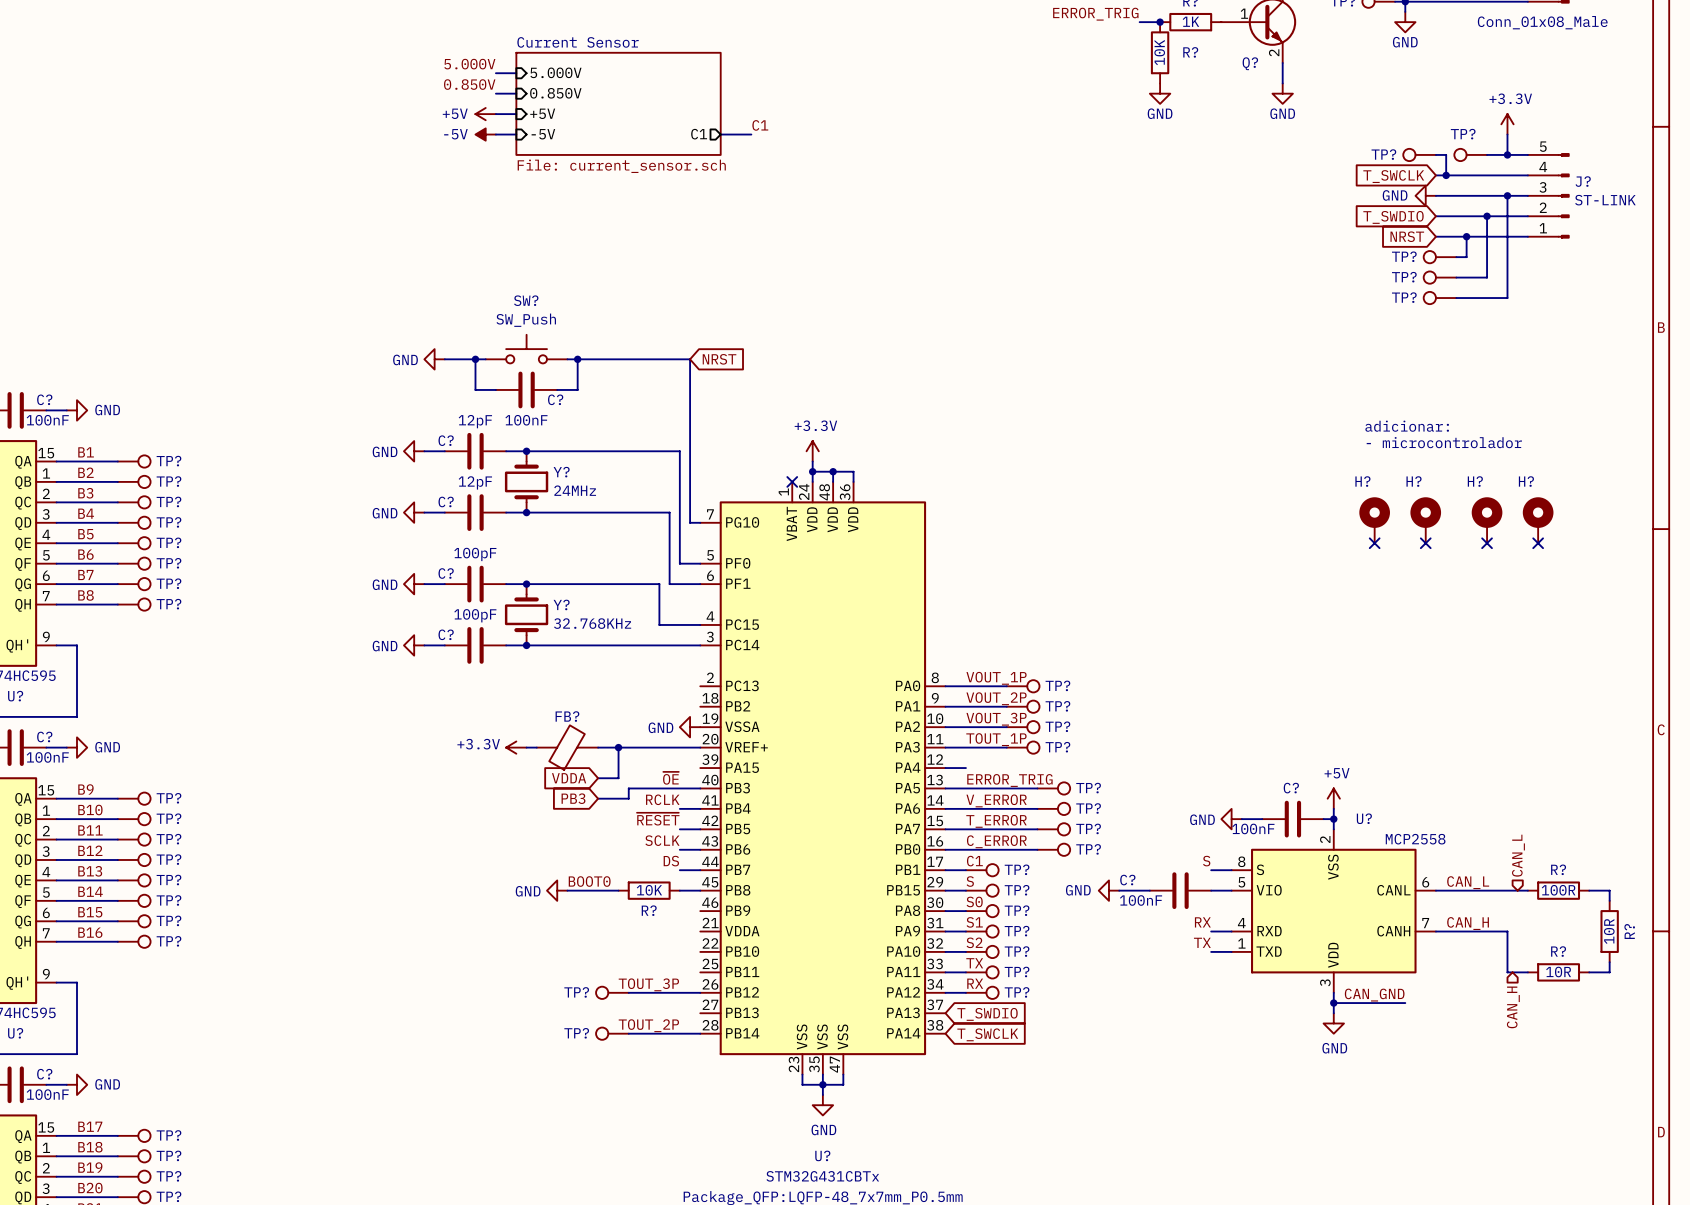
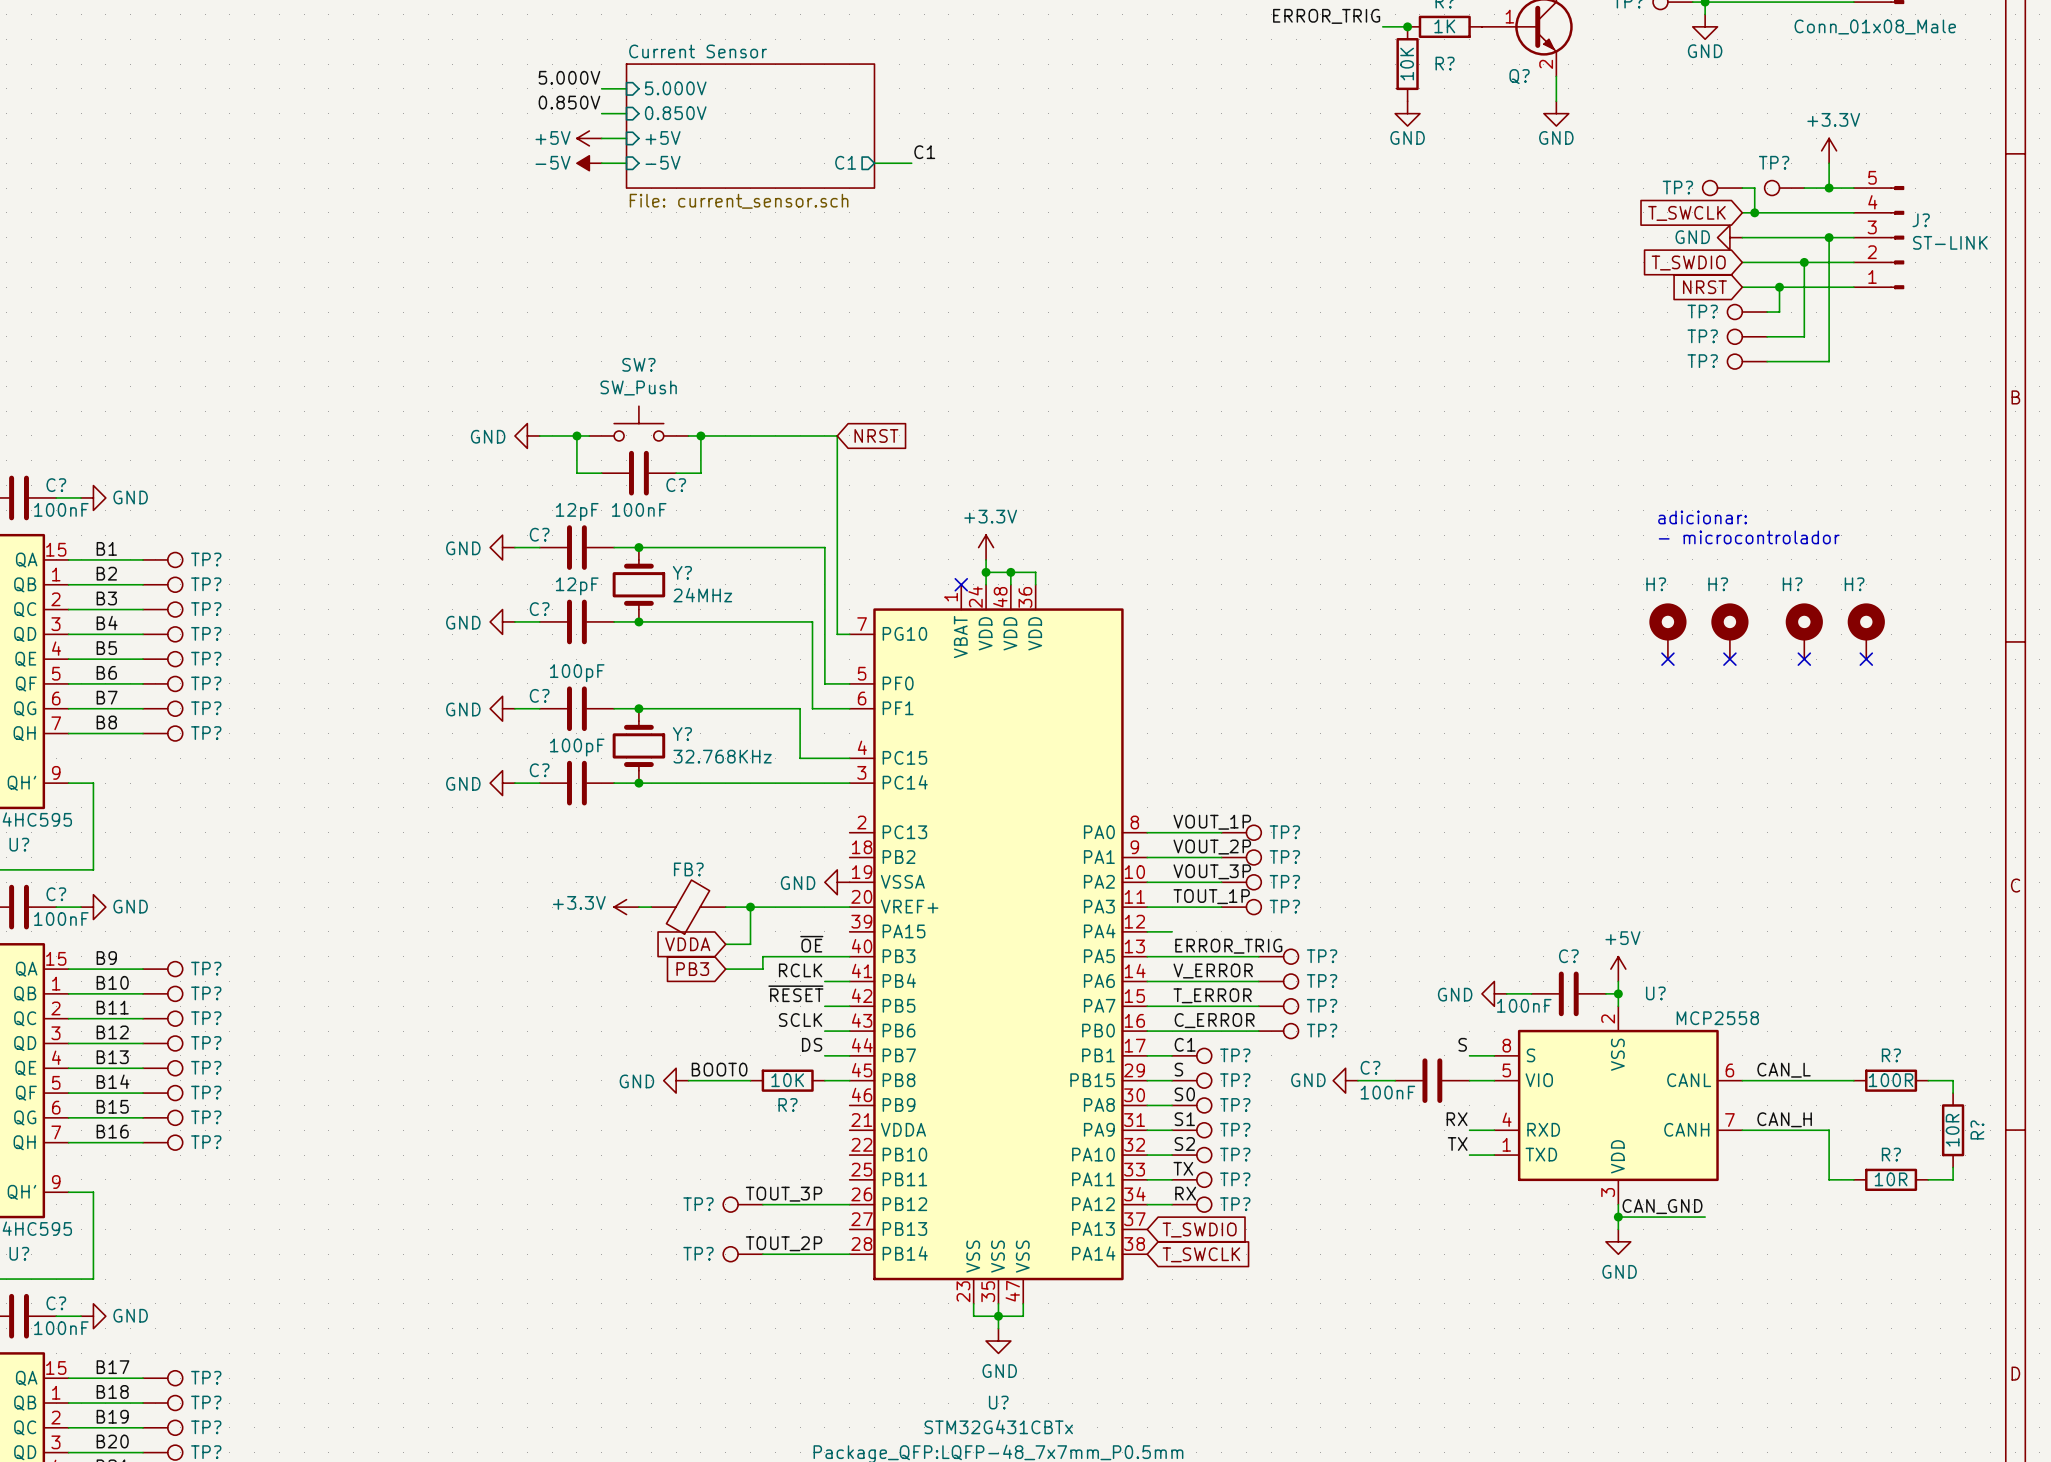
hierarchical label: CAN_L (1518, 855) -> none
hierarchical label: CAN_H (1513, 1007) -> none

